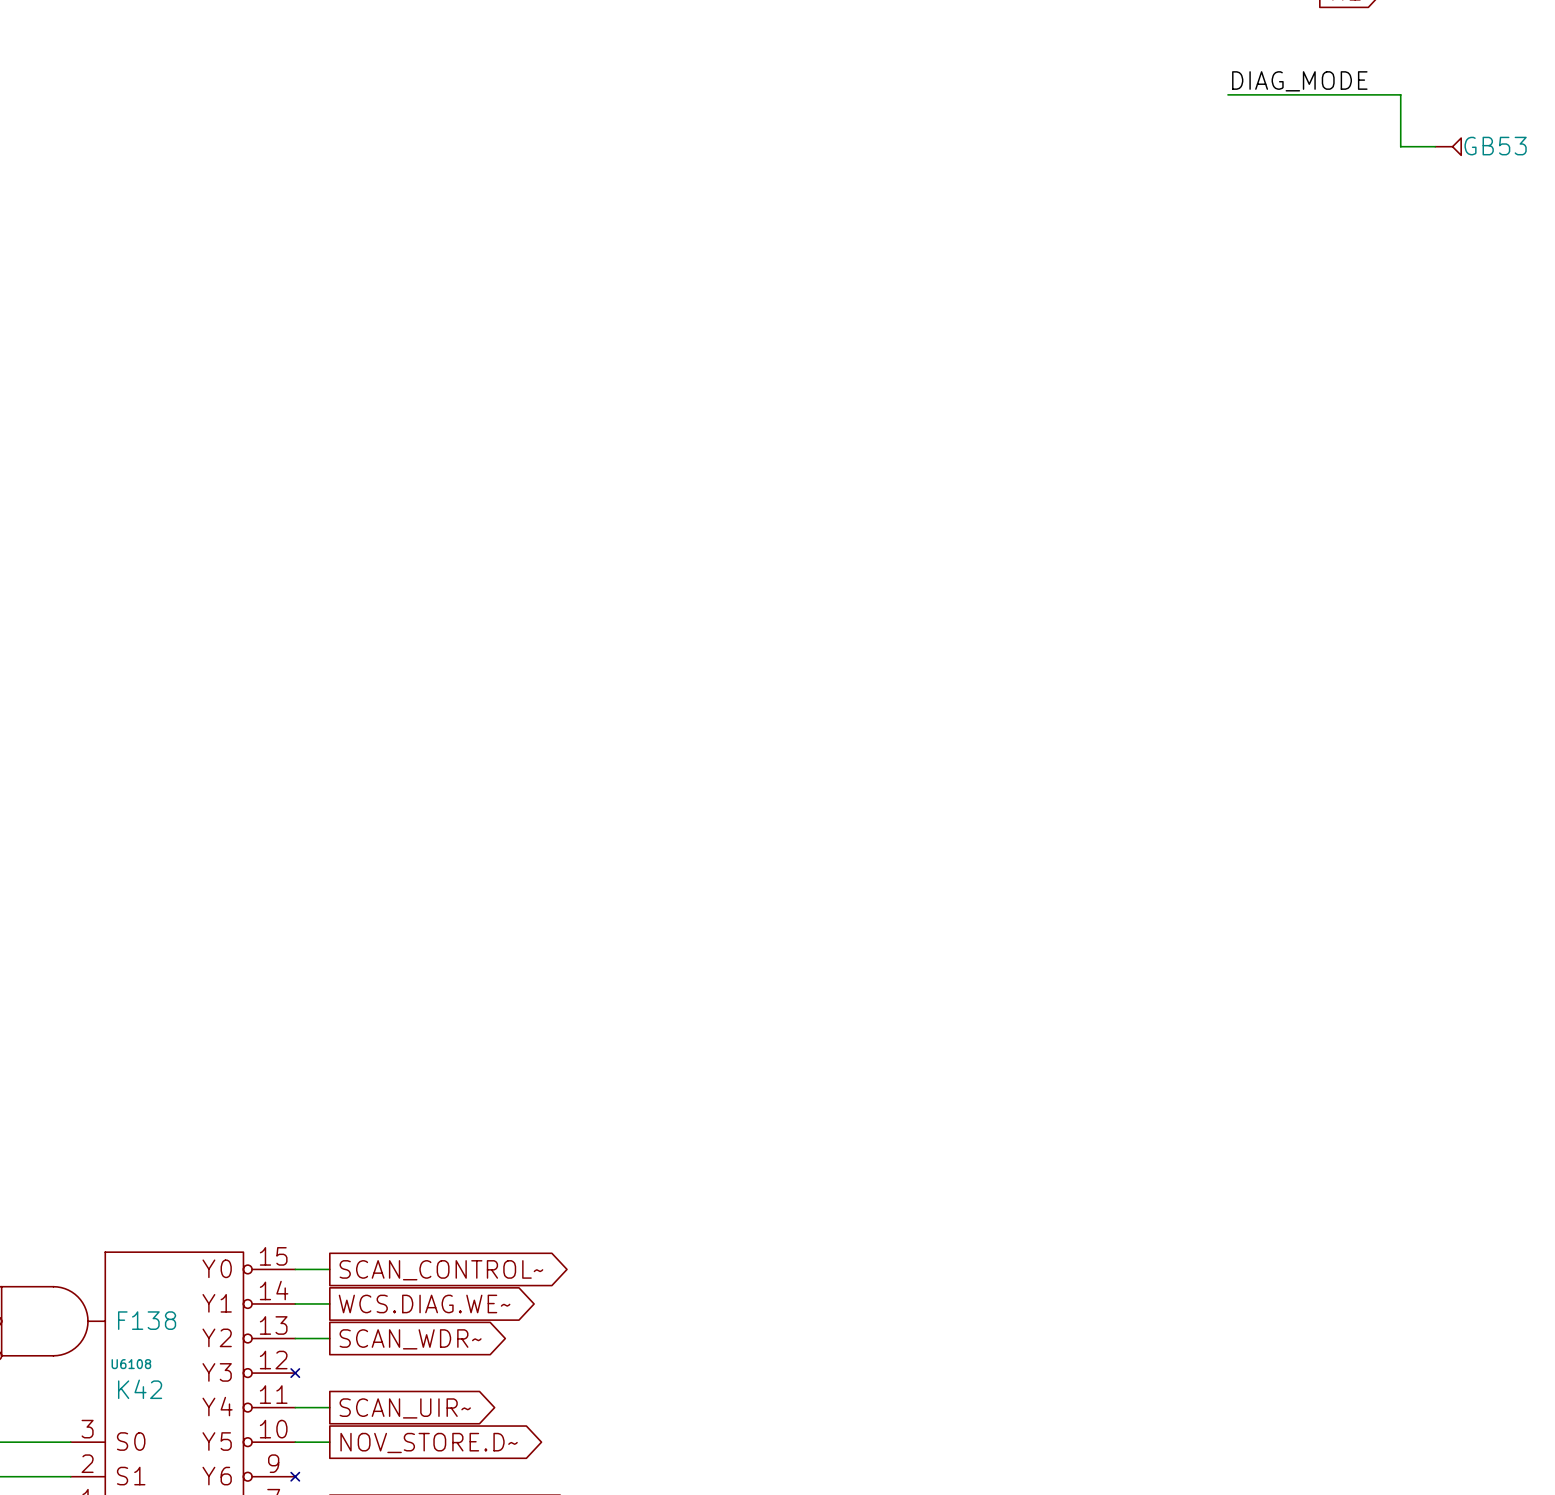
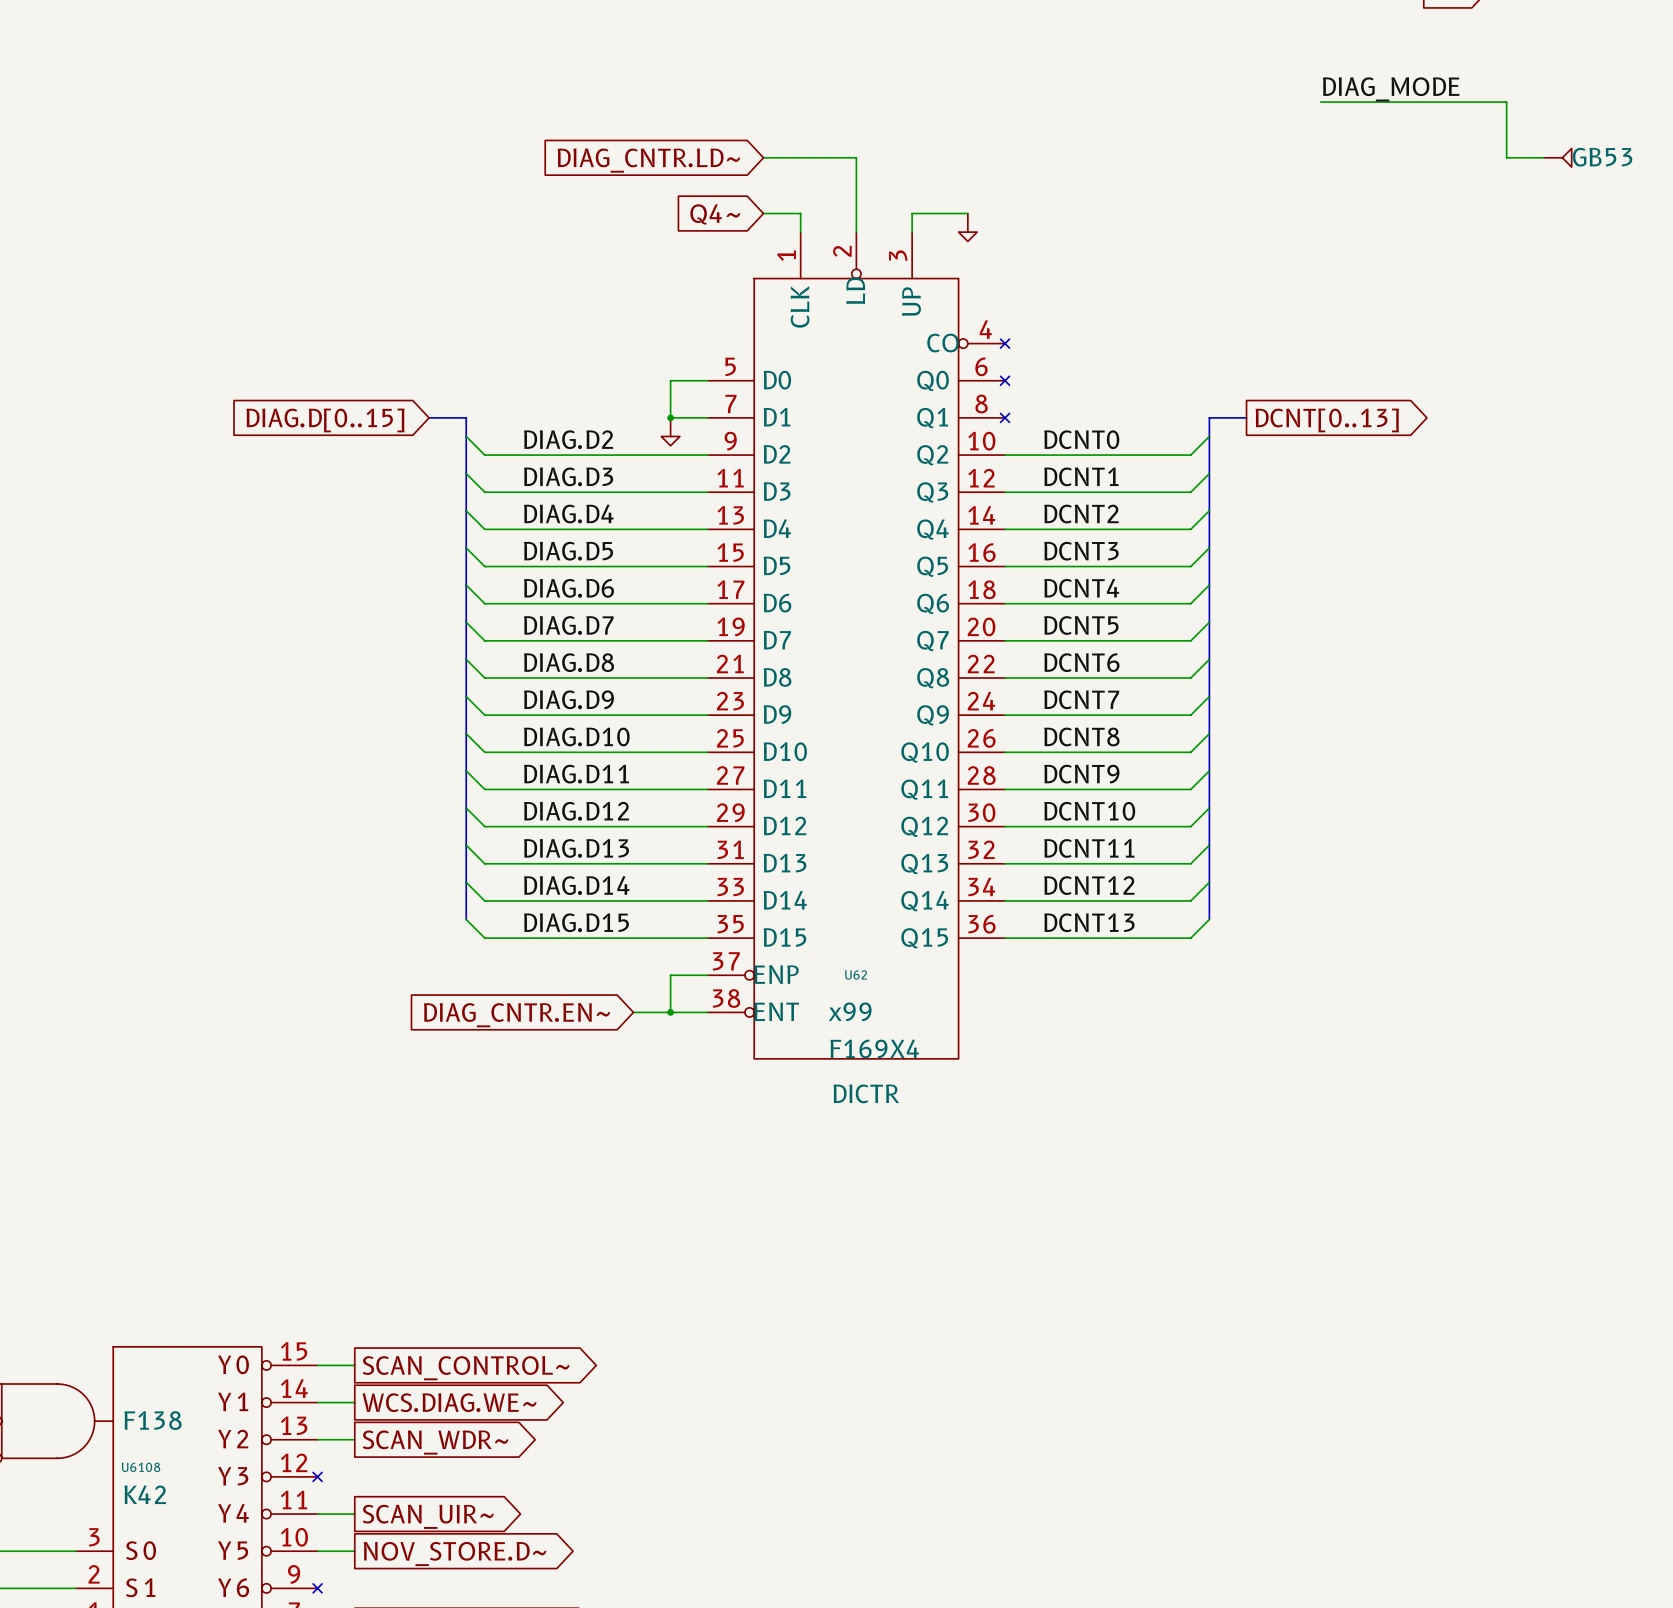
wire: none -> (763, 157) (856, 157) (856, 232)
global label: none -> DIAG_CNTR.LD~ (648, 160)
global label: none -> Q4~ (715, 214)
wire: none -> (763, 213) (800, 213) (800, 232)
wire: none -> (967, 213) (912, 213) (912, 232)
power symbol: none -> (967, 227)
no-connect mark: none -> (1005, 343)
wire: none -> (707, 380) (670, 380) (670, 417) (707, 417)
no-connect mark: none -> (1005, 380)
bus: none -> (429, 417) (466, 417) (466, 919)
junction: none -> (670, 417)
no-connect mark: none -> (1005, 417)
bus: none -> (1246, 417) (1209, 417) (1209, 919)
global label: none -> DIAG.D[0..15] (325, 420)
global label: none -> DCNT[0..13] (1327, 420)
power symbol: none -> (670, 432)
wire: none -> (466, 436) (484, 455) (707, 455)
wire: none -> (1209, 436) (1190, 455) (1005, 455)
label: none -> DIAG.D2 (568, 439)
label: none -> DCNT0 (1081, 439)
wire: none -> (466, 473) (484, 492) (707, 492)
wire: none -> (1209, 473) (1190, 492) (1005, 492)
label: none -> DIAG.D3 (568, 476)
label: none -> DCNT1 (1081, 476)
wire: none -> (466, 510) (484, 529) (707, 529)
wire: none -> (1209, 510) (1190, 529) (1005, 529)
label: none -> DIAG.D4 (568, 514)
label: none -> DCNT2 (1081, 514)
wire: none -> (466, 547) (484, 566) (707, 566)
wire: none -> (1209, 547) (1190, 566) (1005, 566)
label: none -> DIAG.D5 (568, 551)
label: none -> DCNT3 (1081, 551)
wire: none -> (466, 585) (484, 603) (707, 603)
wire: none -> (1209, 585) (1190, 603) (1005, 603)
label: none -> DIAG.D6 (569, 588)
label: none -> DCNT4 (1081, 588)
wire: none -> (466, 622) (484, 640) (707, 640)
wire: none -> (1209, 622) (1190, 640) (1005, 640)
label: none -> DIAG.D7 (568, 625)
label: none -> DCNT5 (1081, 625)
U62: none -> F169X4 (856, 645)
wire: none -> (466, 659) (484, 678) (707, 678)
wire: none -> (1209, 659) (1190, 678) (1005, 678)
label: none -> DIAG.D8 (569, 662)
label: none -> DCNT6 (1081, 662)
wire: none -> (466, 696) (484, 715) (707, 715)
wire: none -> (1209, 696) (1190, 715) (1005, 715)
label: none -> DIAG.D9 (568, 699)
label: none -> DCNT7 (1081, 699)
wire: none -> (466, 733) (484, 752) (707, 752)
wire: none -> (1209, 733) (1190, 752) (1005, 752)
label: none -> DIAG.D10 (576, 736)
label: none -> DCNT8 (1081, 736)
wire: none -> (466, 770) (484, 789) (707, 789)
wire: none -> (1209, 770) (1190, 789) (1005, 789)
label: none -> DIAG.D11 (576, 774)
label: none -> DCNT9 (1081, 774)
wire: none -> (466, 808) (484, 826) (707, 826)
wire: none -> (1209, 808) (1190, 826) (1005, 826)
label: none -> DIAG.D12 (576, 811)
label: none -> DCNT10 (1089, 811)
wire: none -> (466, 845) (484, 863) (707, 863)
wire: none -> (1209, 845) (1190, 863) (1005, 863)
label: none -> DIAG.D13 (576, 848)
label: none -> DCNT11 (1089, 848)
wire: none -> (466, 882) (484, 900) (707, 900)
wire: none -> (1209, 882) (1190, 900) (1005, 900)
label: none -> DIAG.D14 (576, 885)
label: none -> DCNT12 (1089, 885)
wire: none -> (466, 919) (484, 938) (707, 938)
wire: none -> (1209, 919) (1190, 938) (1005, 938)
label: none -> DIAG.D15 (576, 922)
label: none -> DCNT13 (1089, 922)
wire: none -> (707, 975) (670, 975) (670, 1012)
wire: none -> (633, 1012) (707, 1012)
junction: none -> (670, 1012)
global label: none -> DIAG_CNTR.EN~ (517, 1015)

